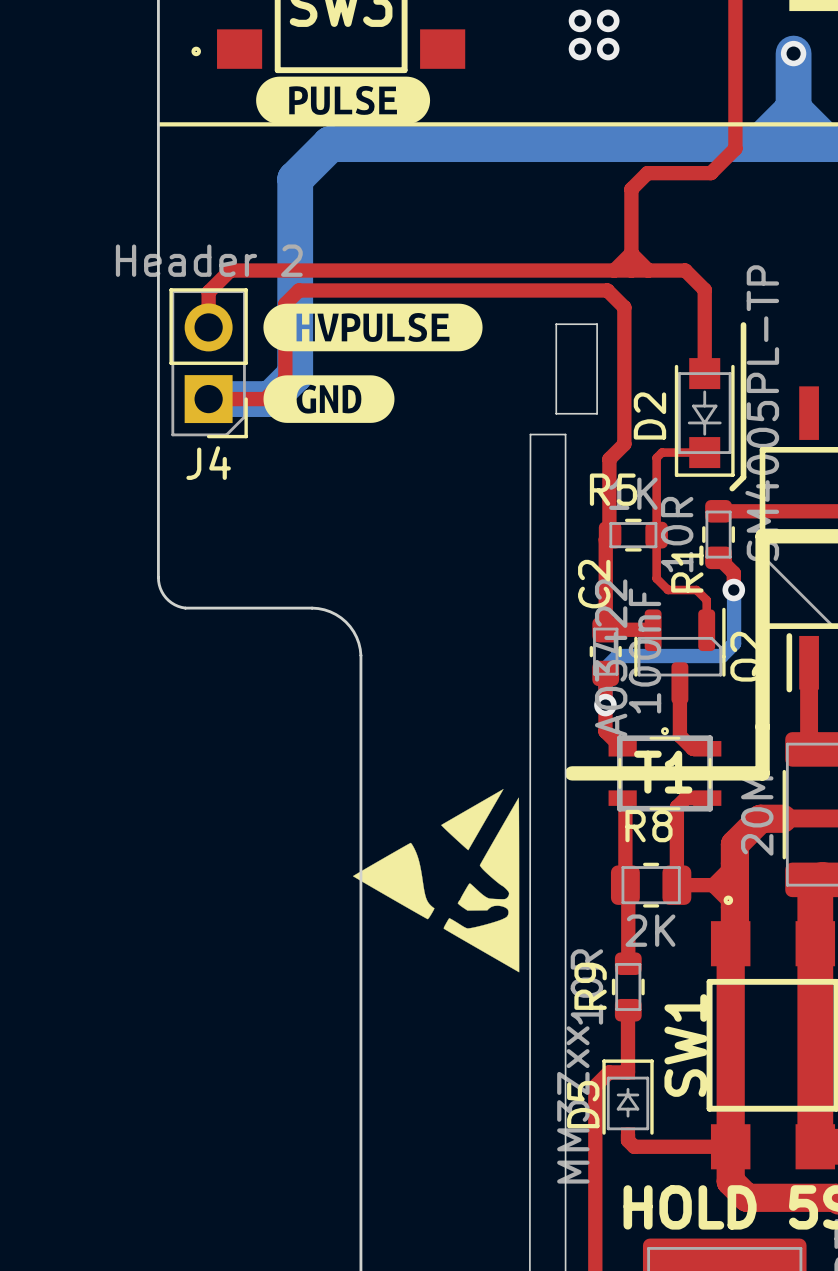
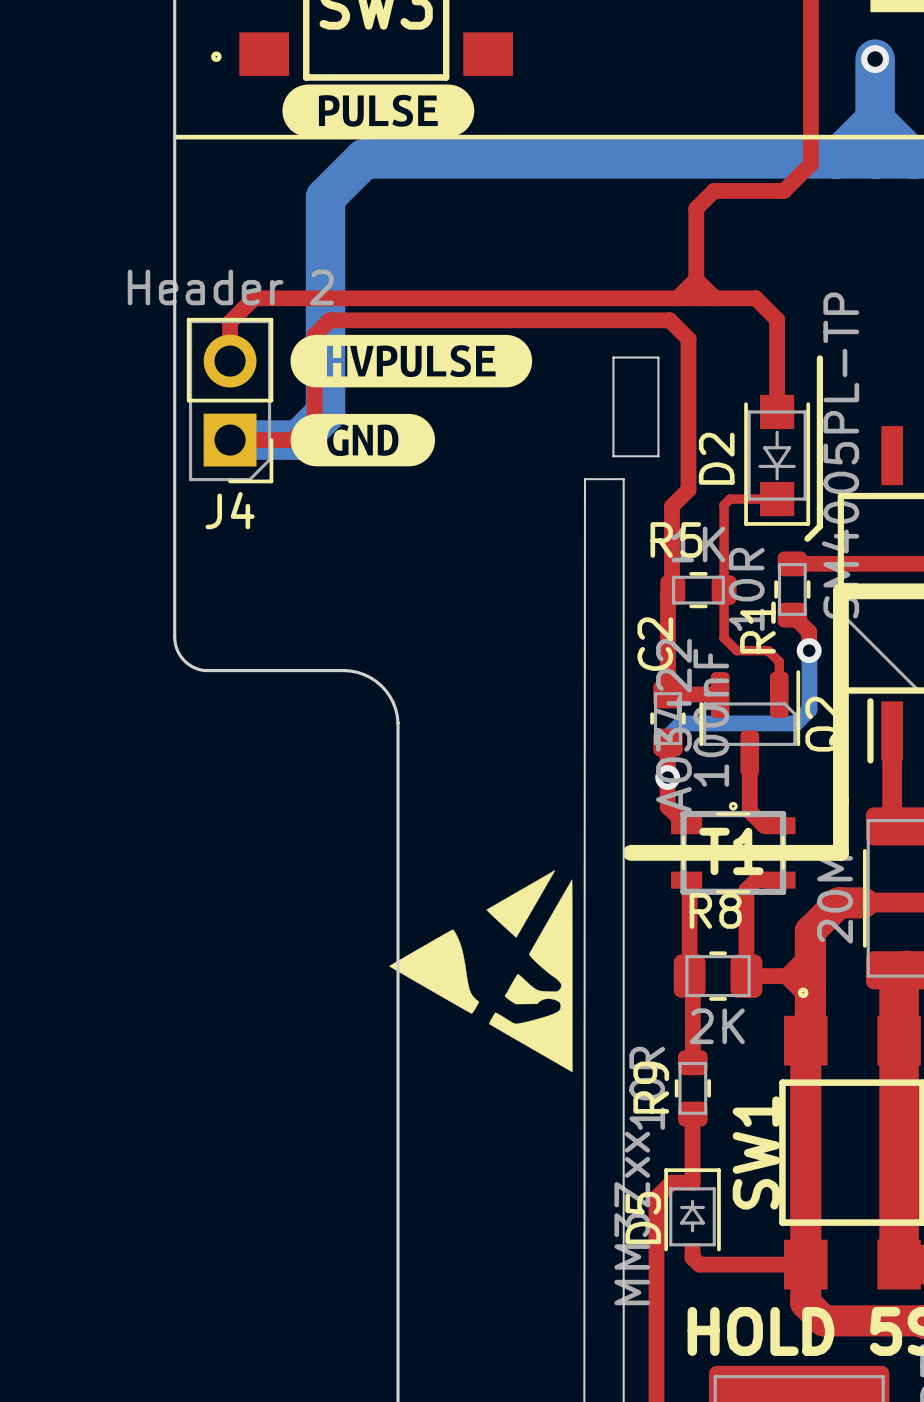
via: (580, 20) -> none
via: (608, 20) -> none
via: (580, 49) -> none
via: (608, 49) -> none

